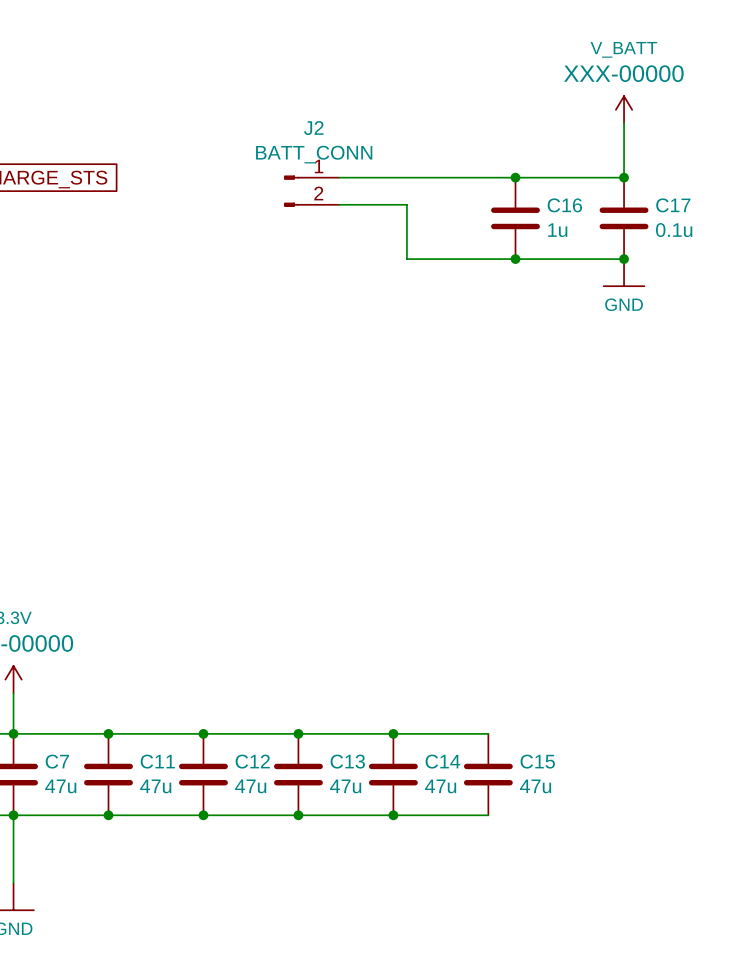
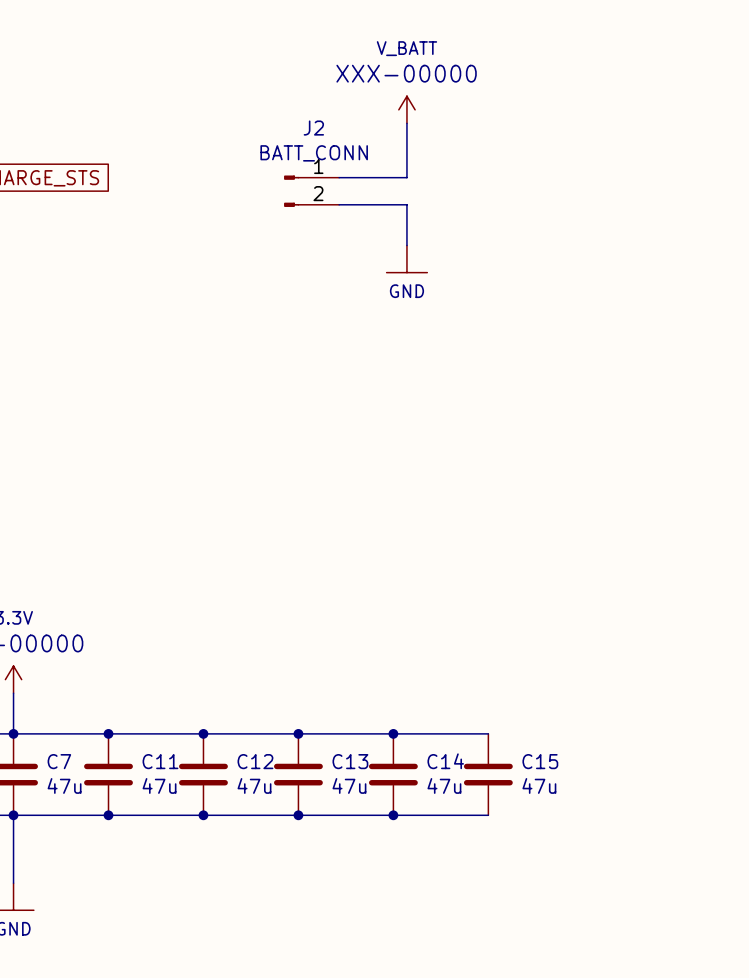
power symbol position: V_BATT (624, 109) -> V_BATT (406, 109)
wire: (624, 123) (624, 177) (406, 177) -> (406, 123) (406, 177)
junction: (515, 177) -> none
junction: (624, 177) -> none
C16: 1u (515, 218) -> none
C17: 0.1u (624, 218) -> none
wire: (406, 245) (406, 259) (624, 259) -> none
junction: (515, 259) -> none
junction: (624, 259) -> none
power symbol position: GND (624, 272) -> GND (406, 259)

